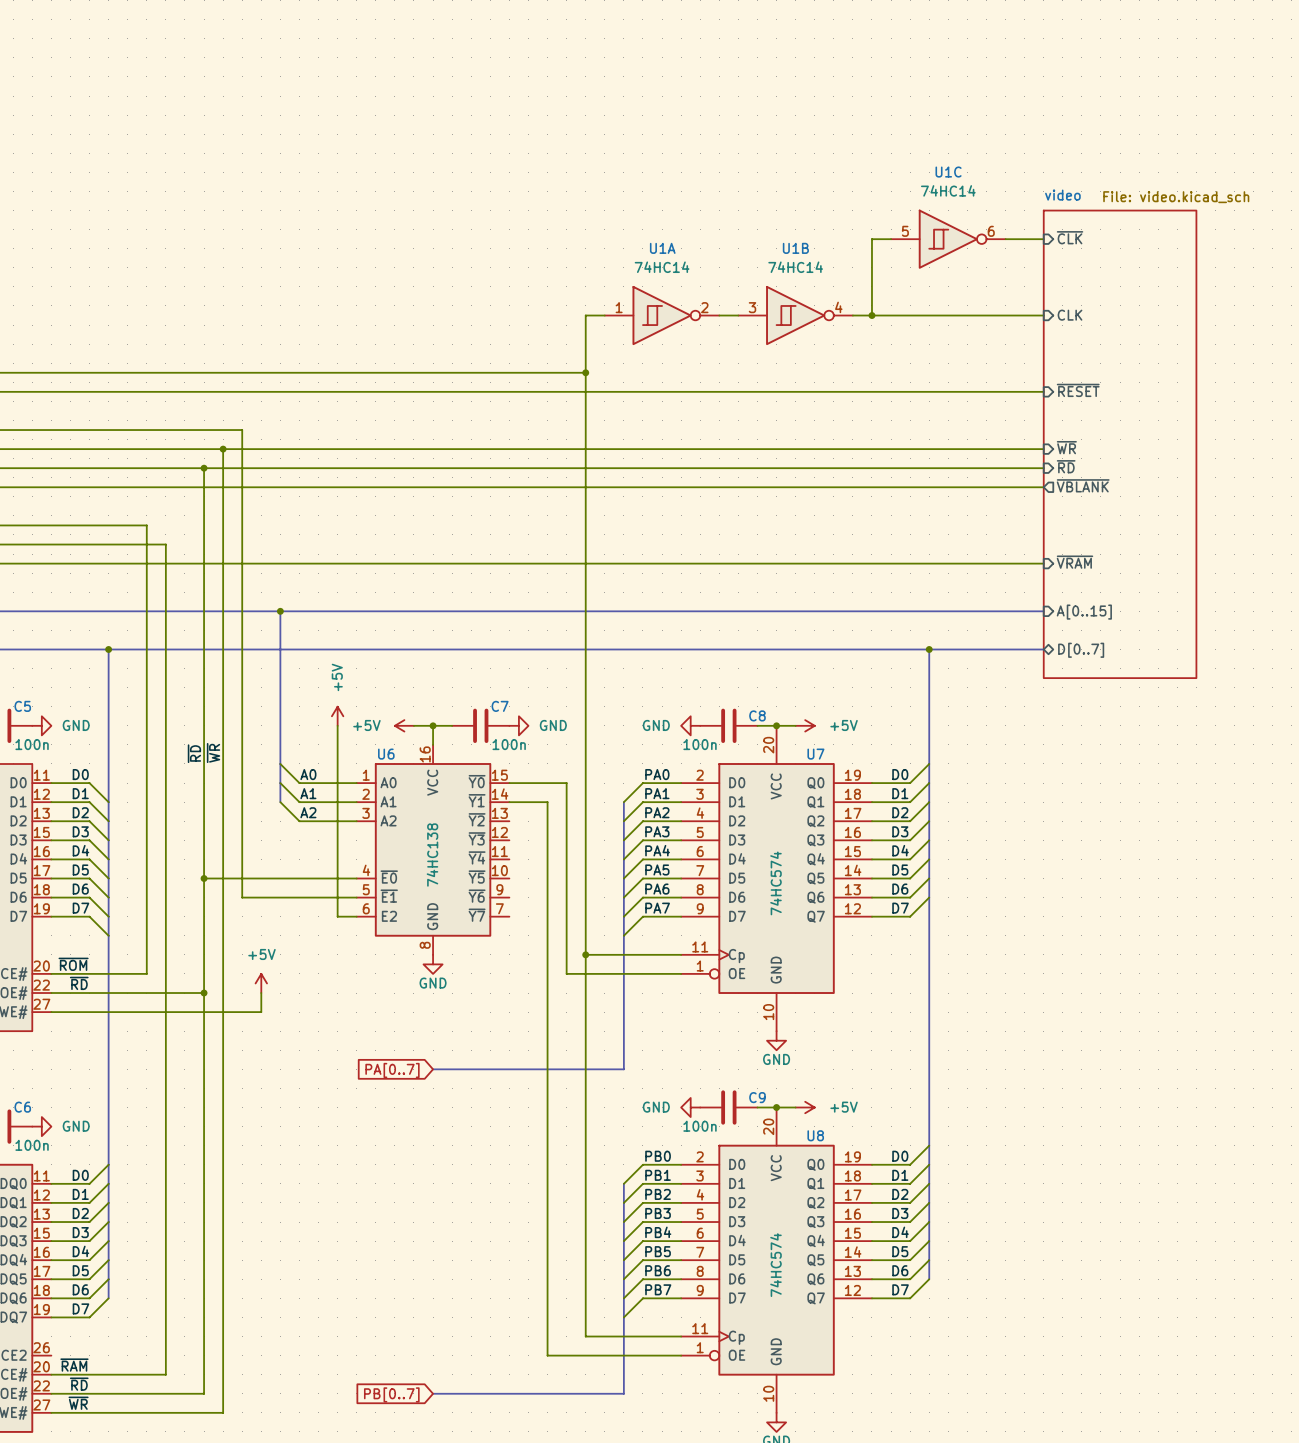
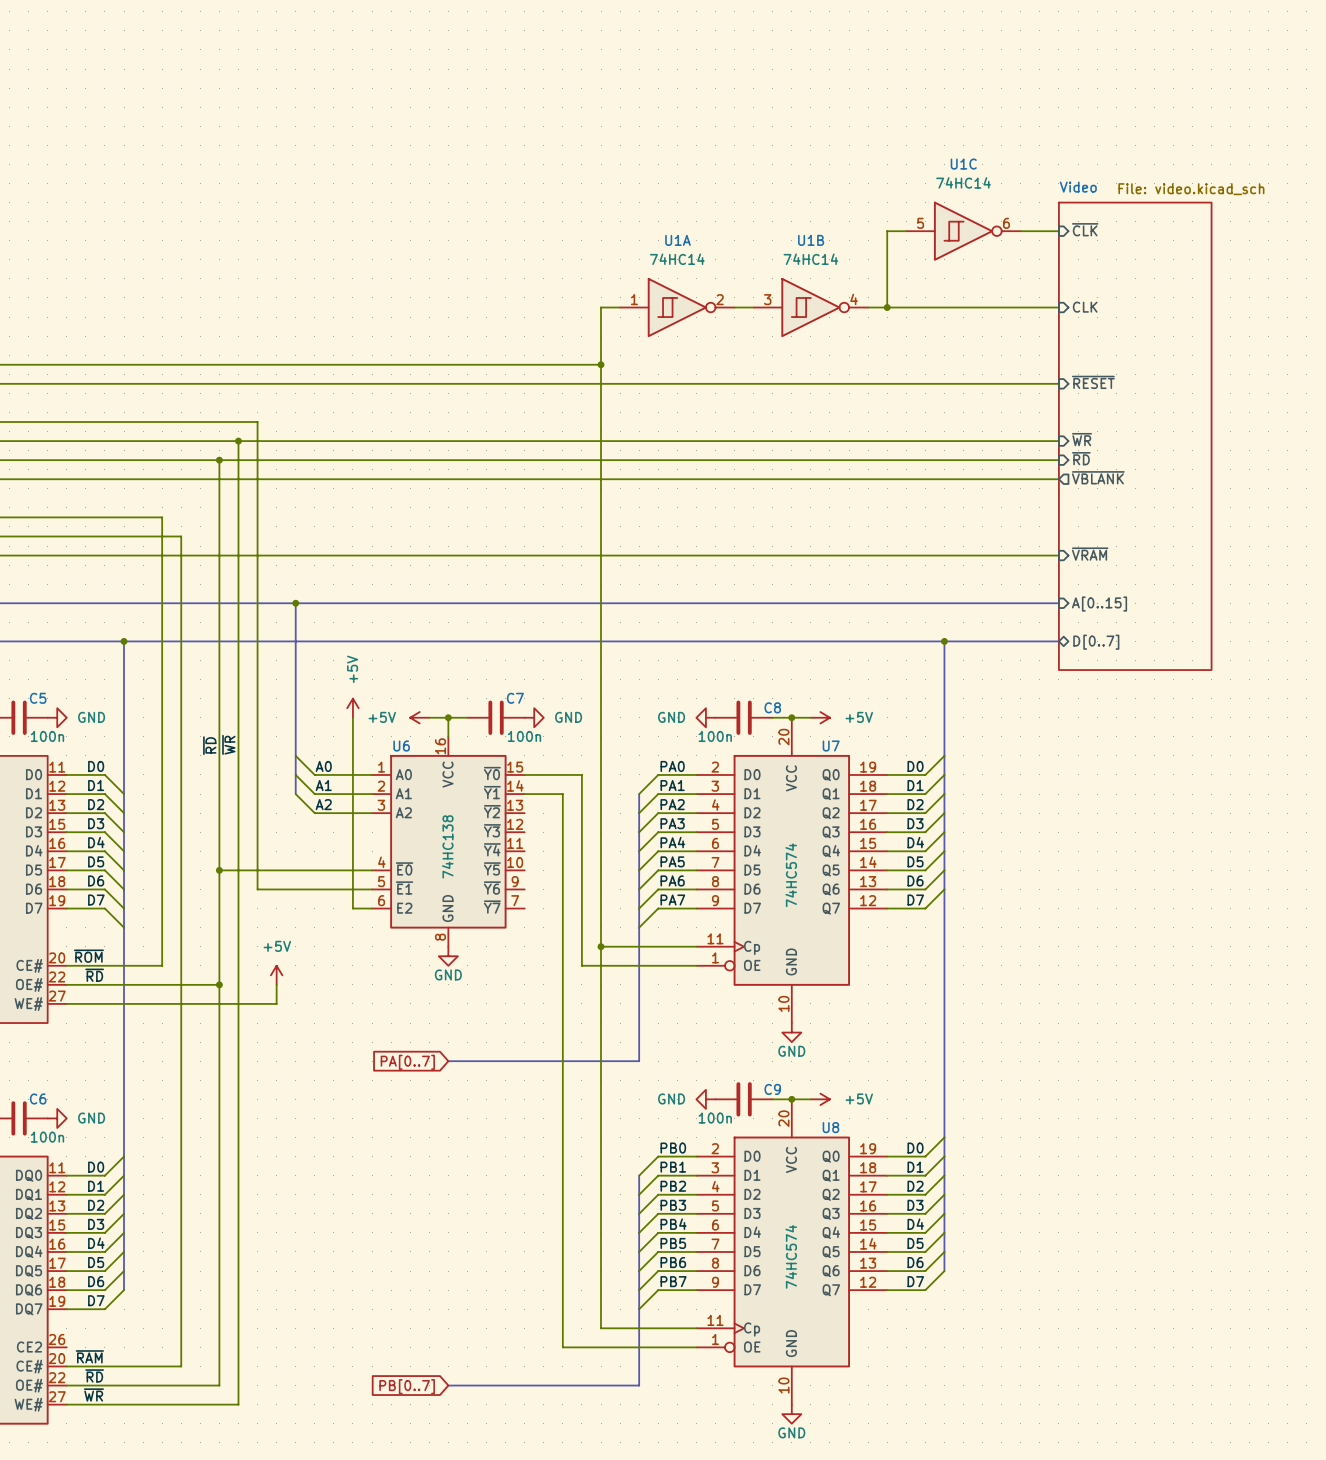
sheet video name: video (1062, 195) -> Video (1078, 187)

